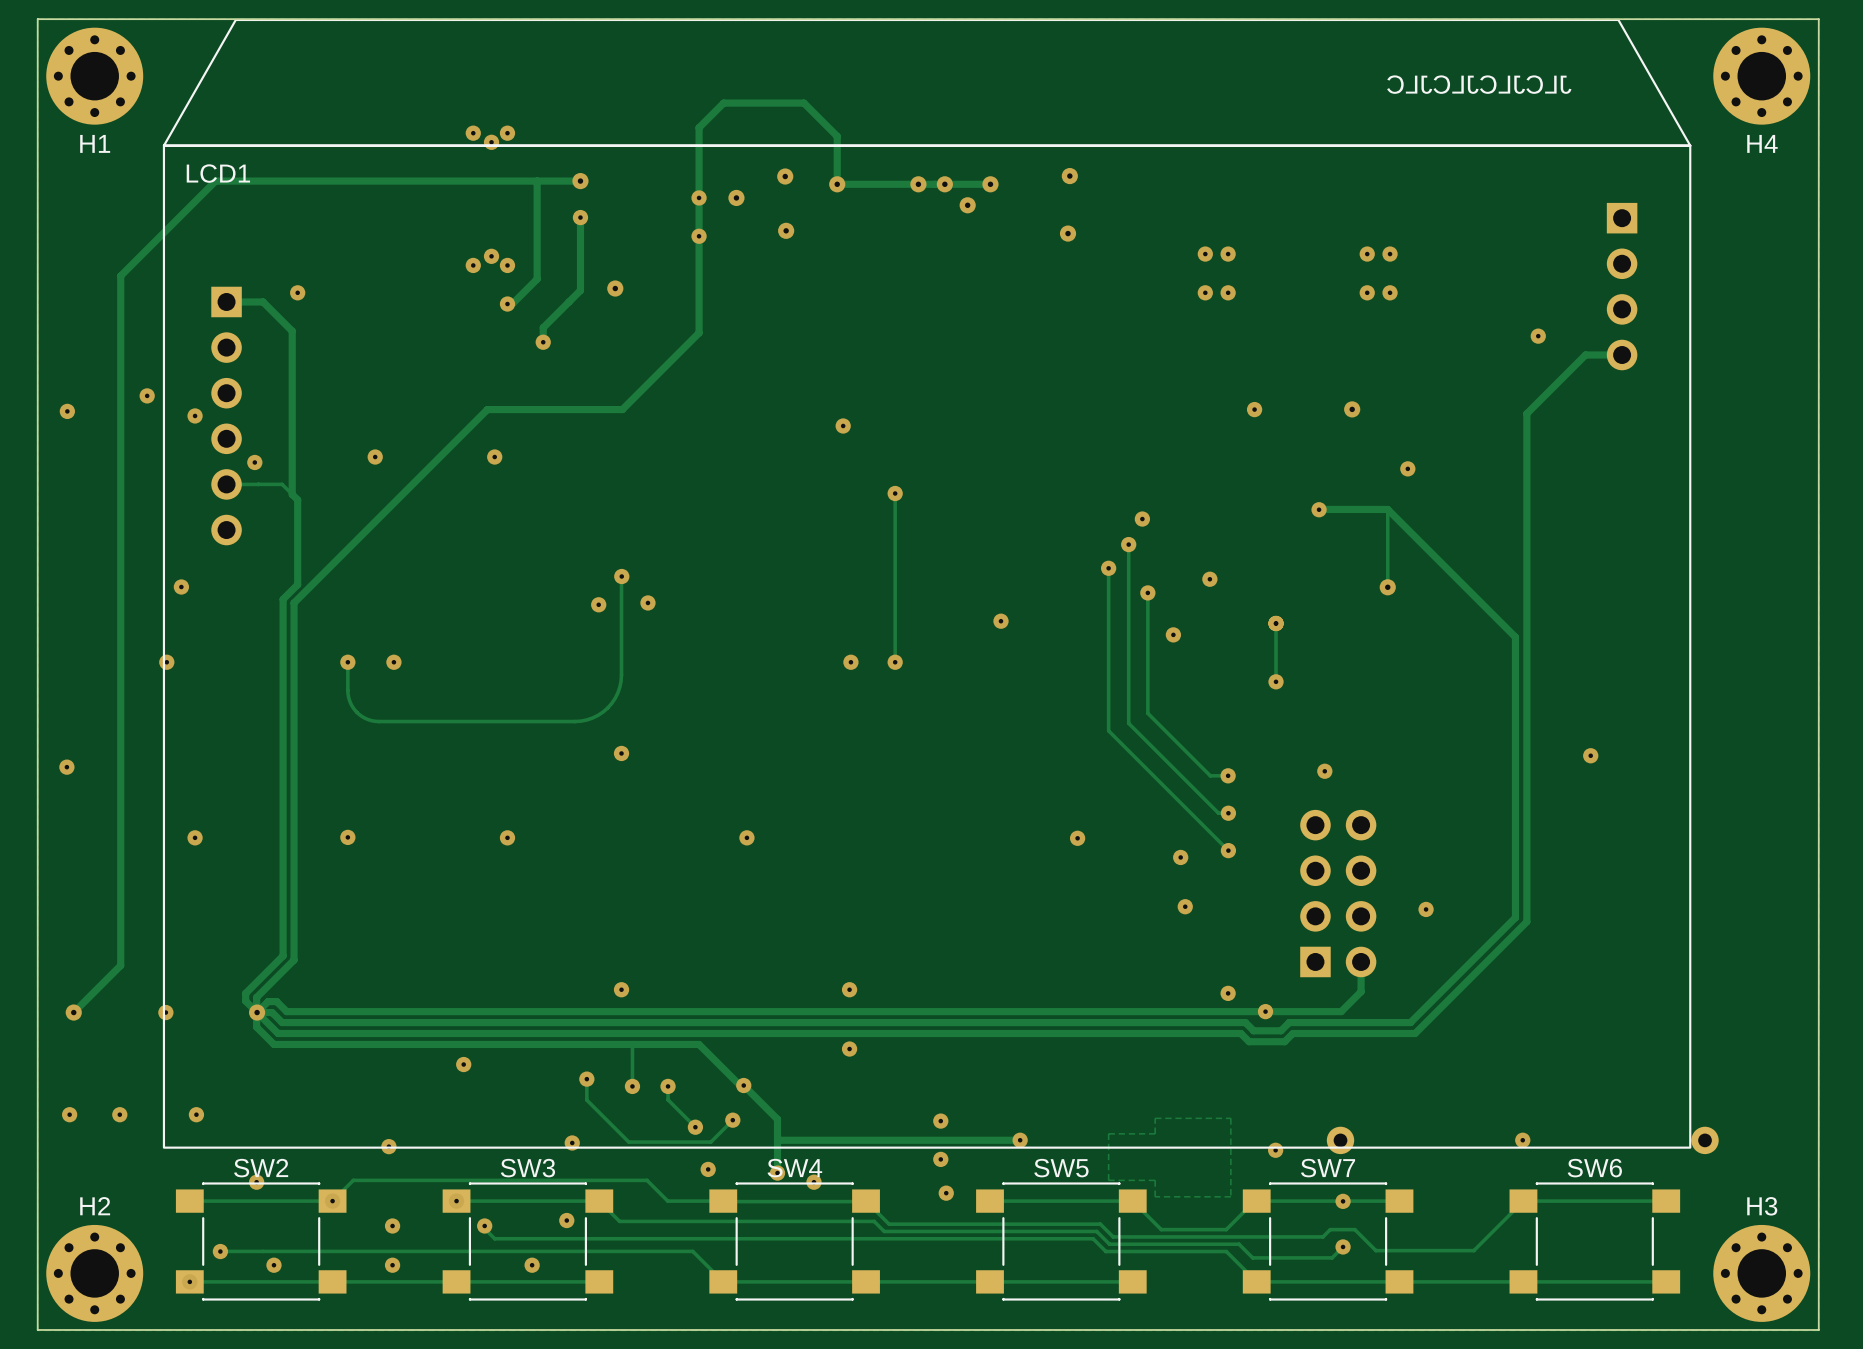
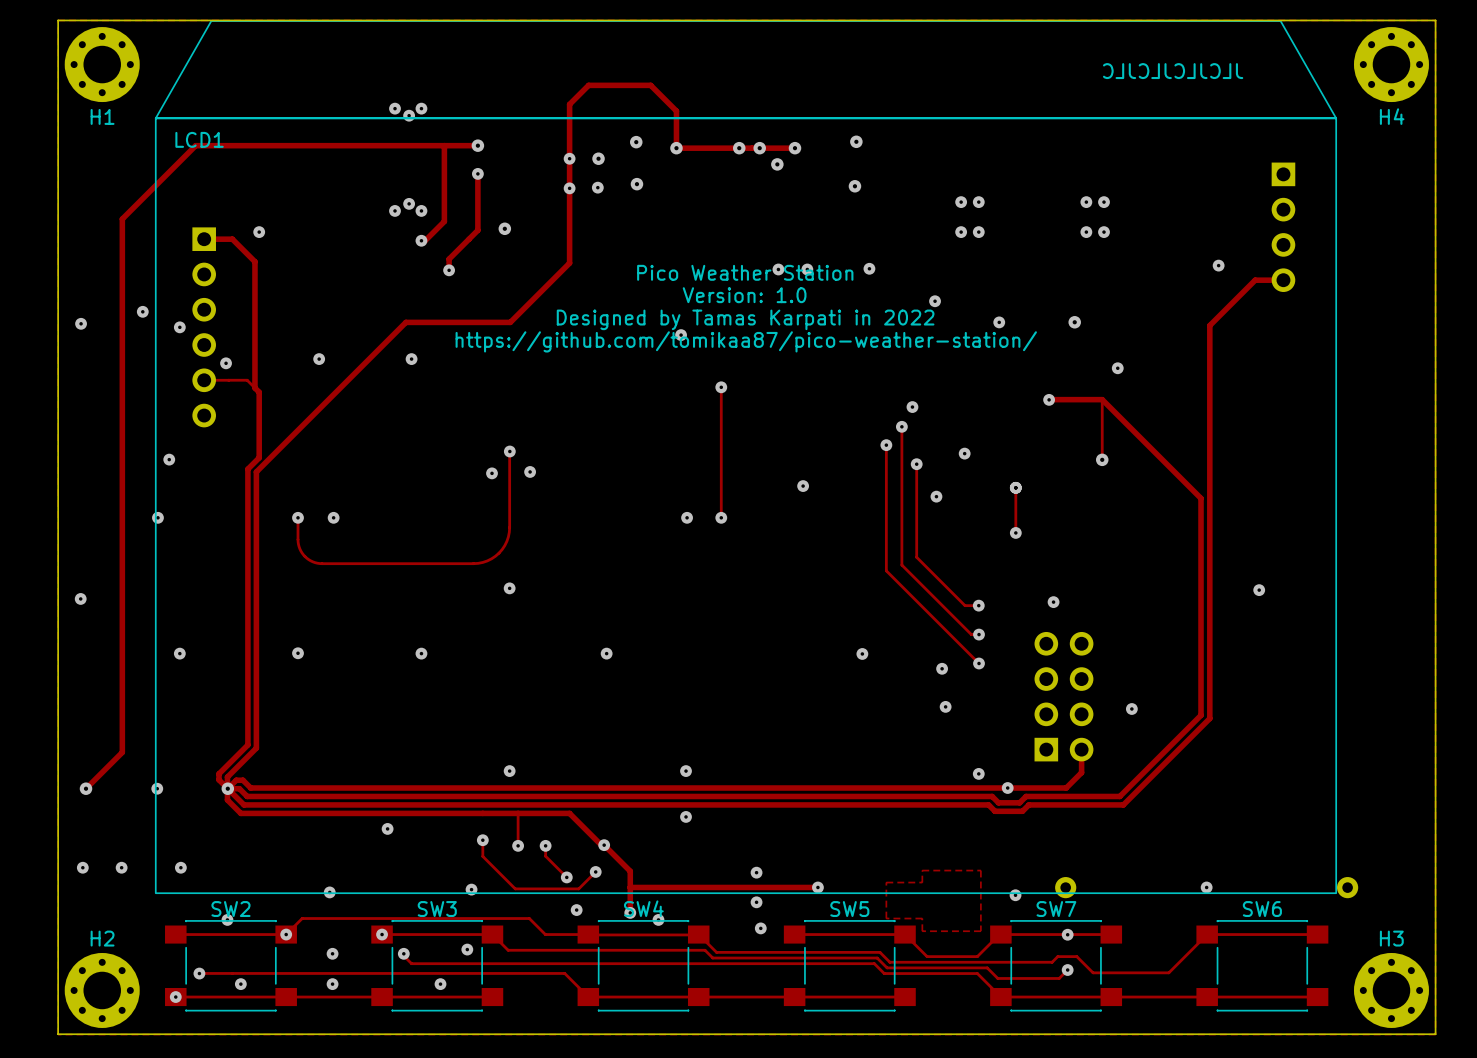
via: none -> (597, 187)
via: none -> (869, 268)
via: none -> (778, 269)
via: none -> (807, 269)
text: none -> Pico Weather Station (745, 272)
text: none -> Version: 1.0 (744, 295)
via: none -> (935, 301)
text: none -> Designed by Tamas Karpati in 2022 (745, 319)
text: none -> https://github.com/tomikaa87/pico-weather-station/ (746, 341)

